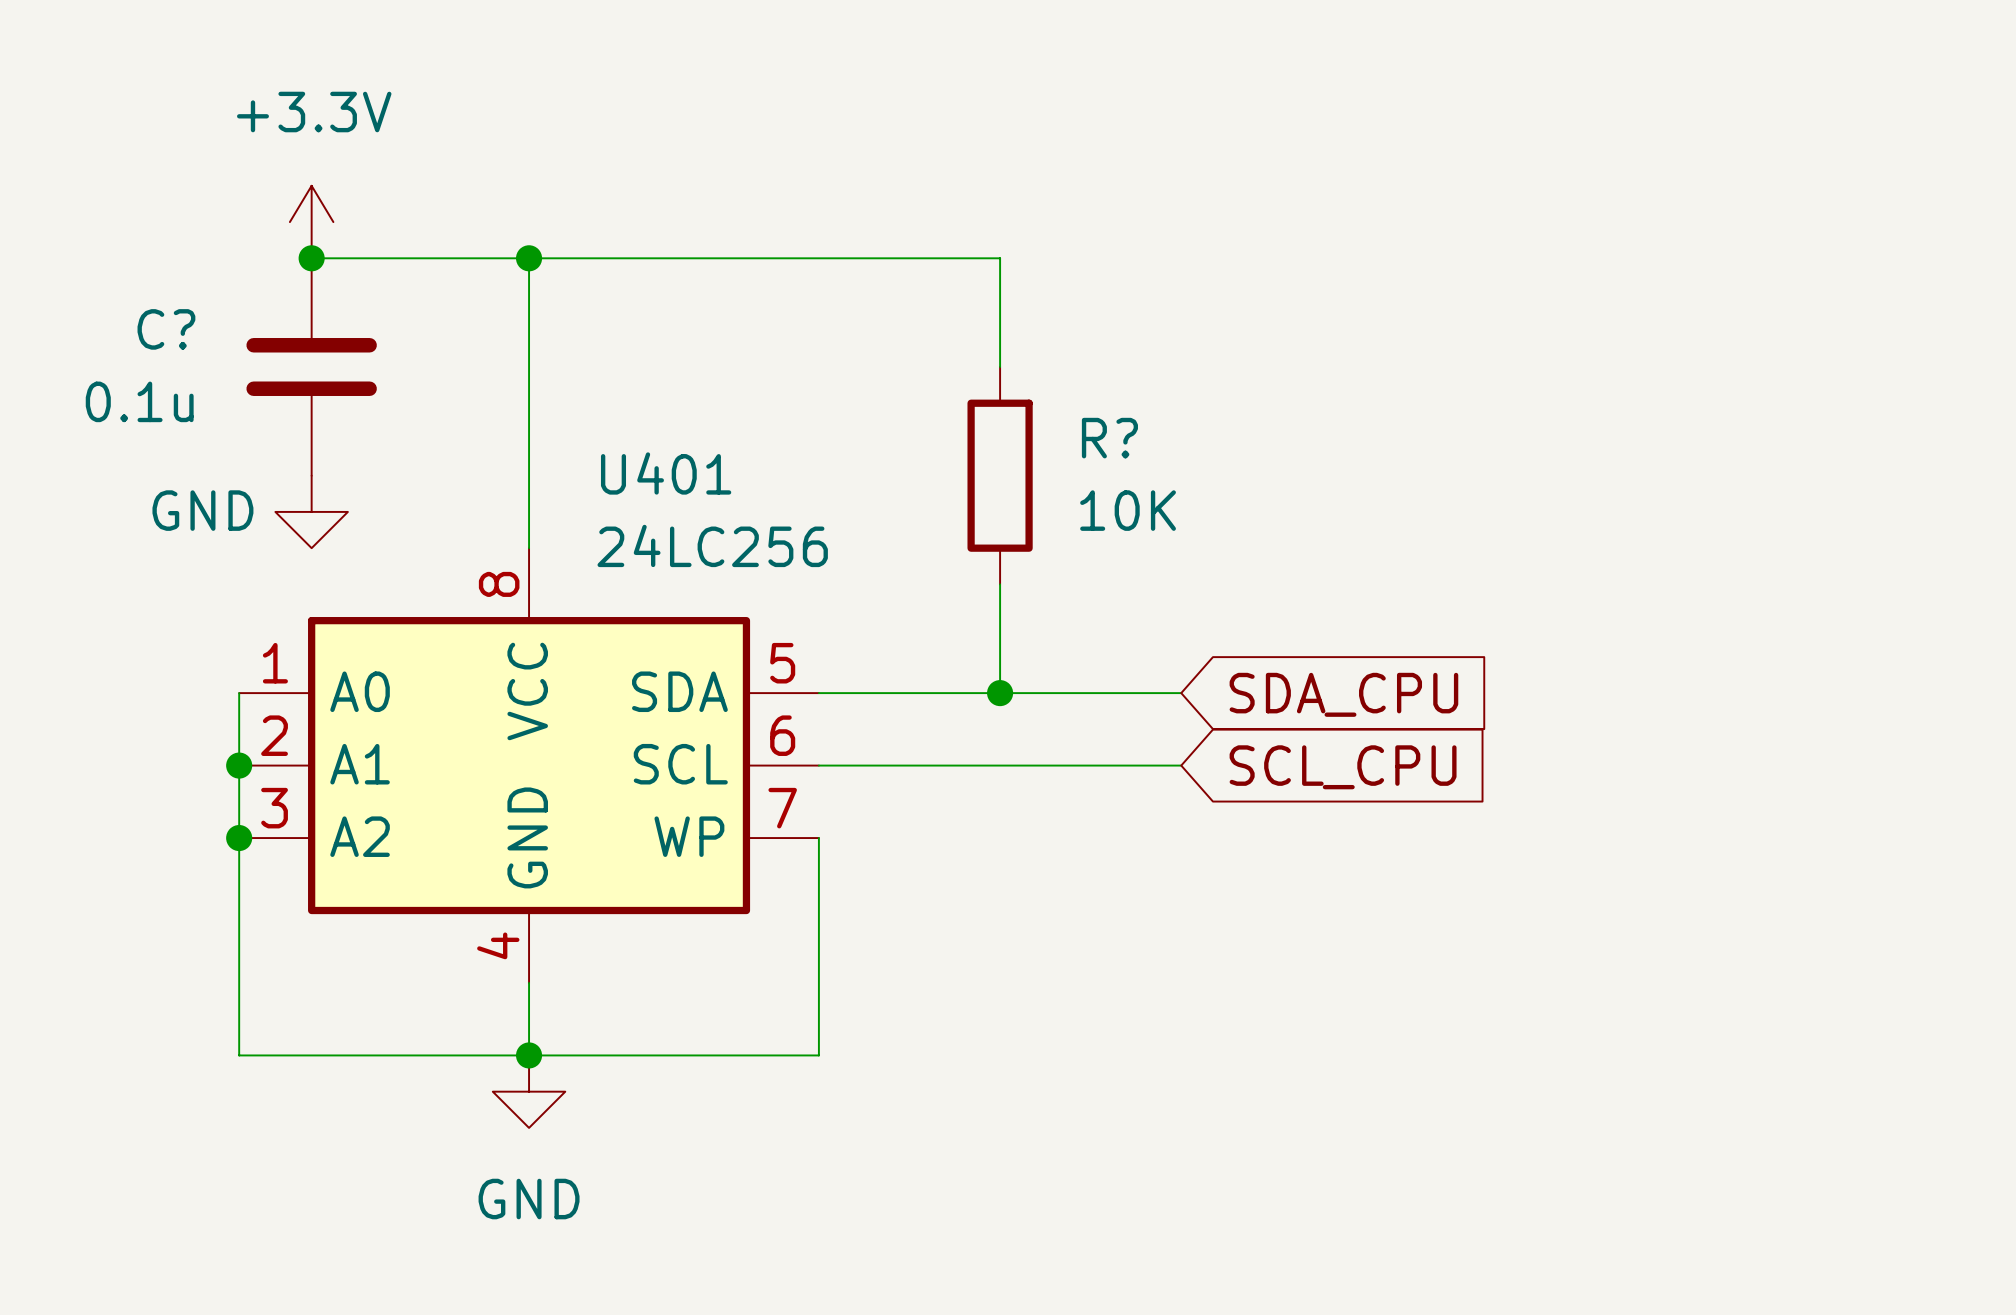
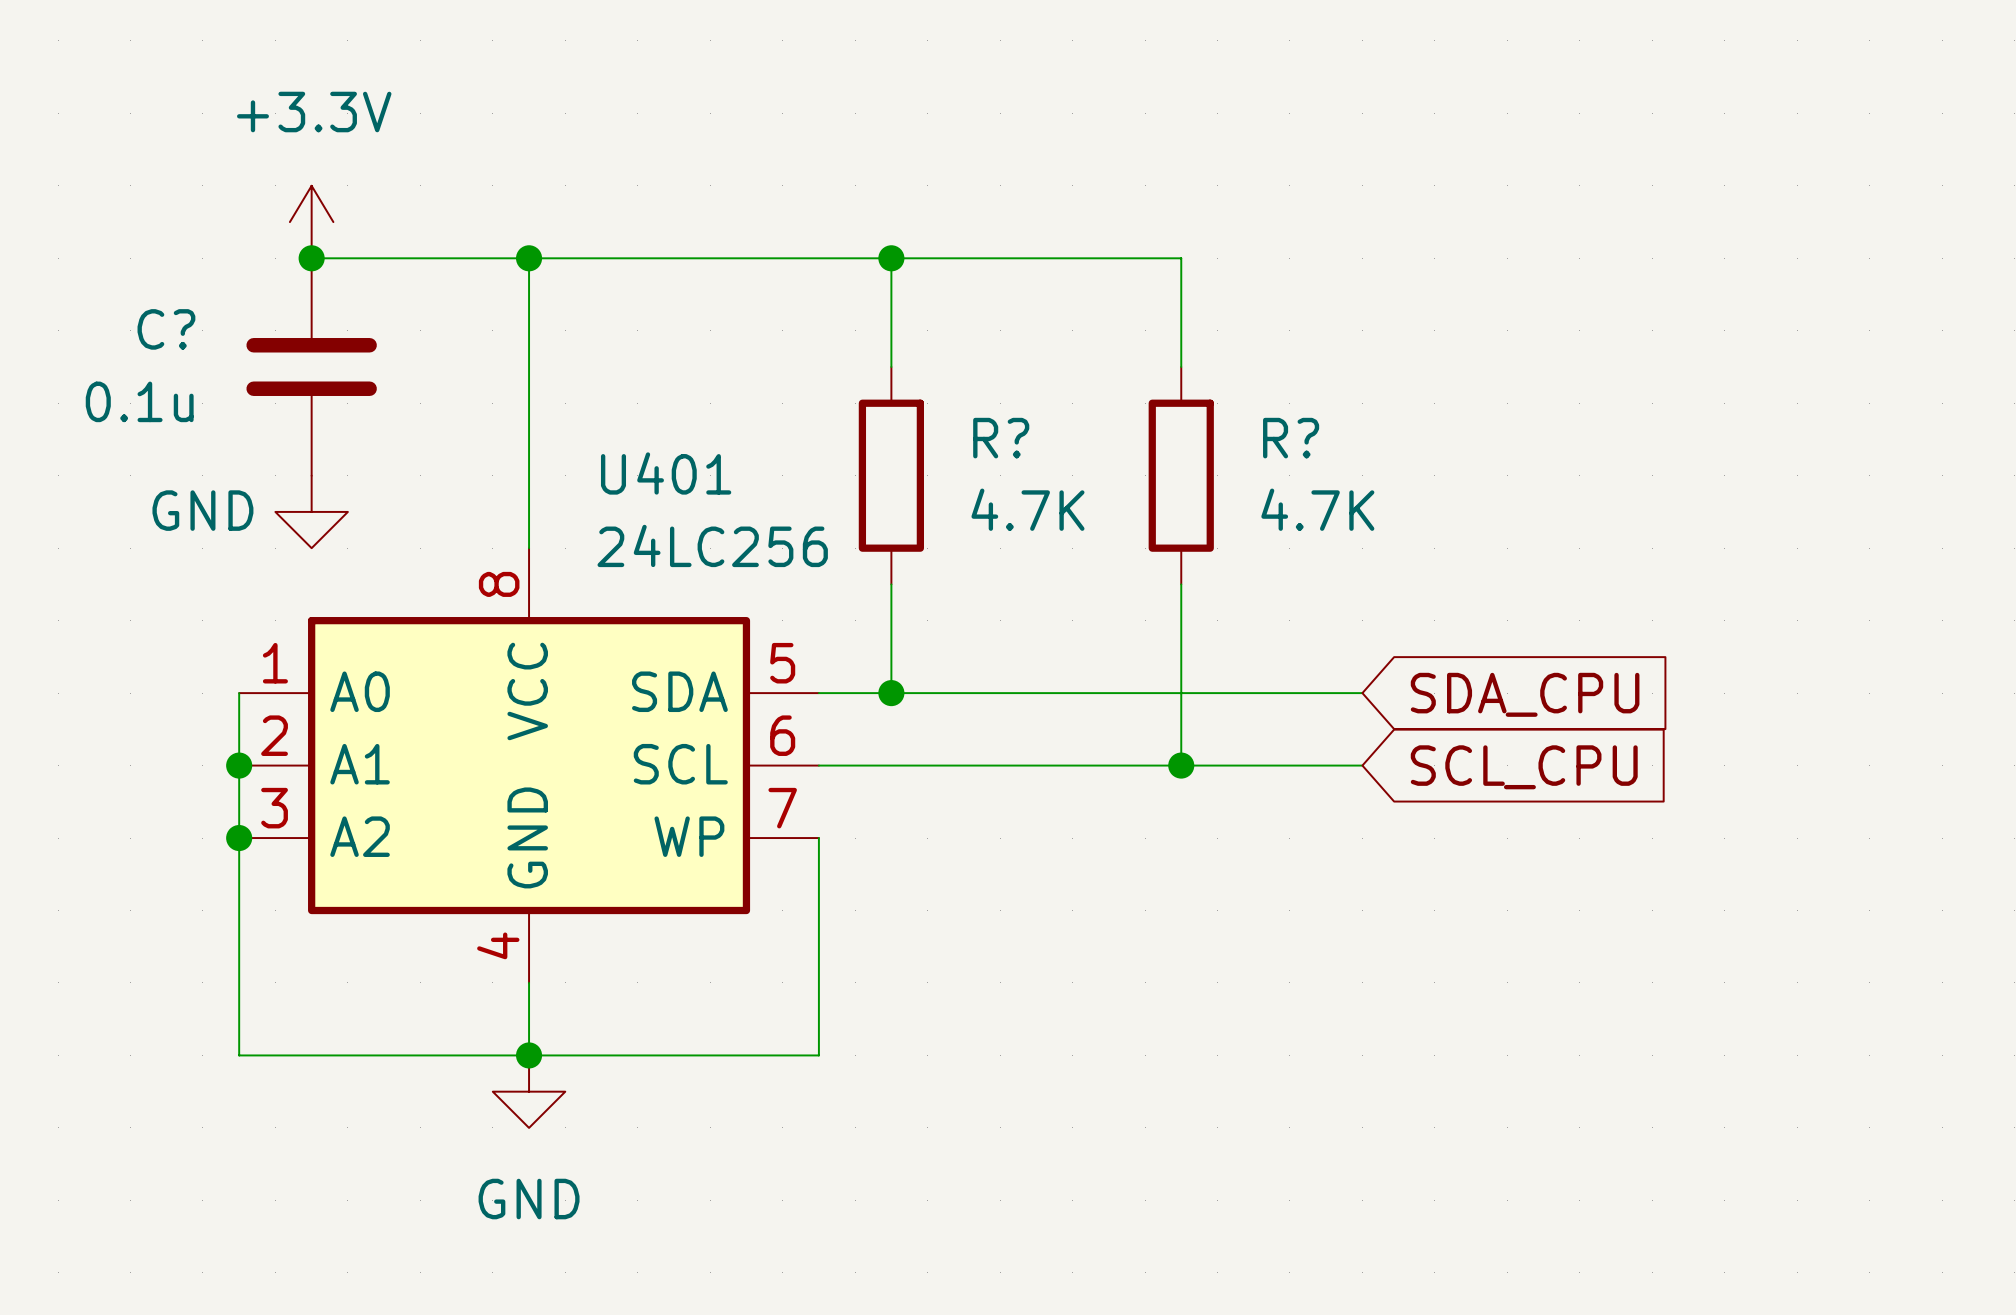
wire: none -> (891, 258) (891, 367)
junction: none -> (891, 258)
wire: (1000, 258) (1000, 367) -> (1000, 258) (1181, 258) (1181, 367)
R?: none -> 4.7K (891, 475)
R?: 10K (1000, 475) -> none
R?: none -> 4.7K (1181, 475)
wire: (1000, 584) (1000, 693) -> (891, 584) (891, 693)
wire: none -> (1181, 584) (1181, 765) (1362, 765)
junction: none -> (891, 693)
junction: (1000, 693) -> none
wire: none -> (1181, 693) (1362, 693)
global label position: SDA_CPU (1343, 694) -> SDA_CPU (1525, 694)
junction: none -> (1181, 765)
global label position: SCL_CPU (1343, 767) -> SCL_CPU (1524, 767)

